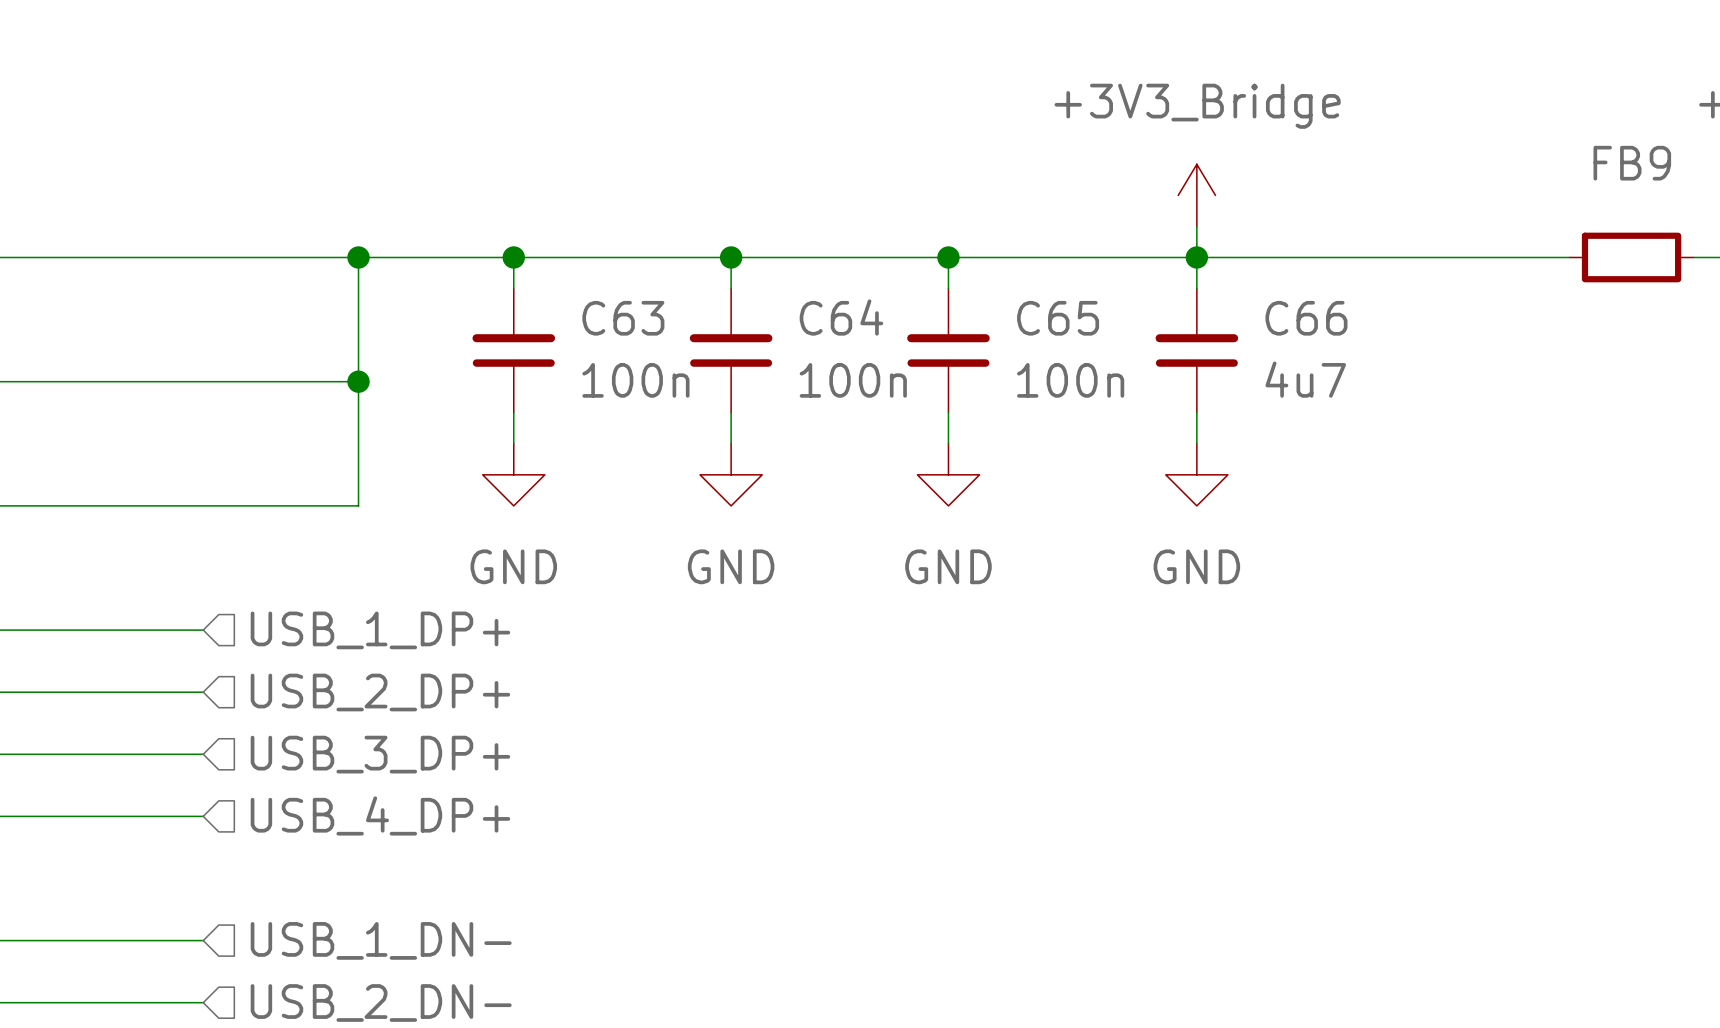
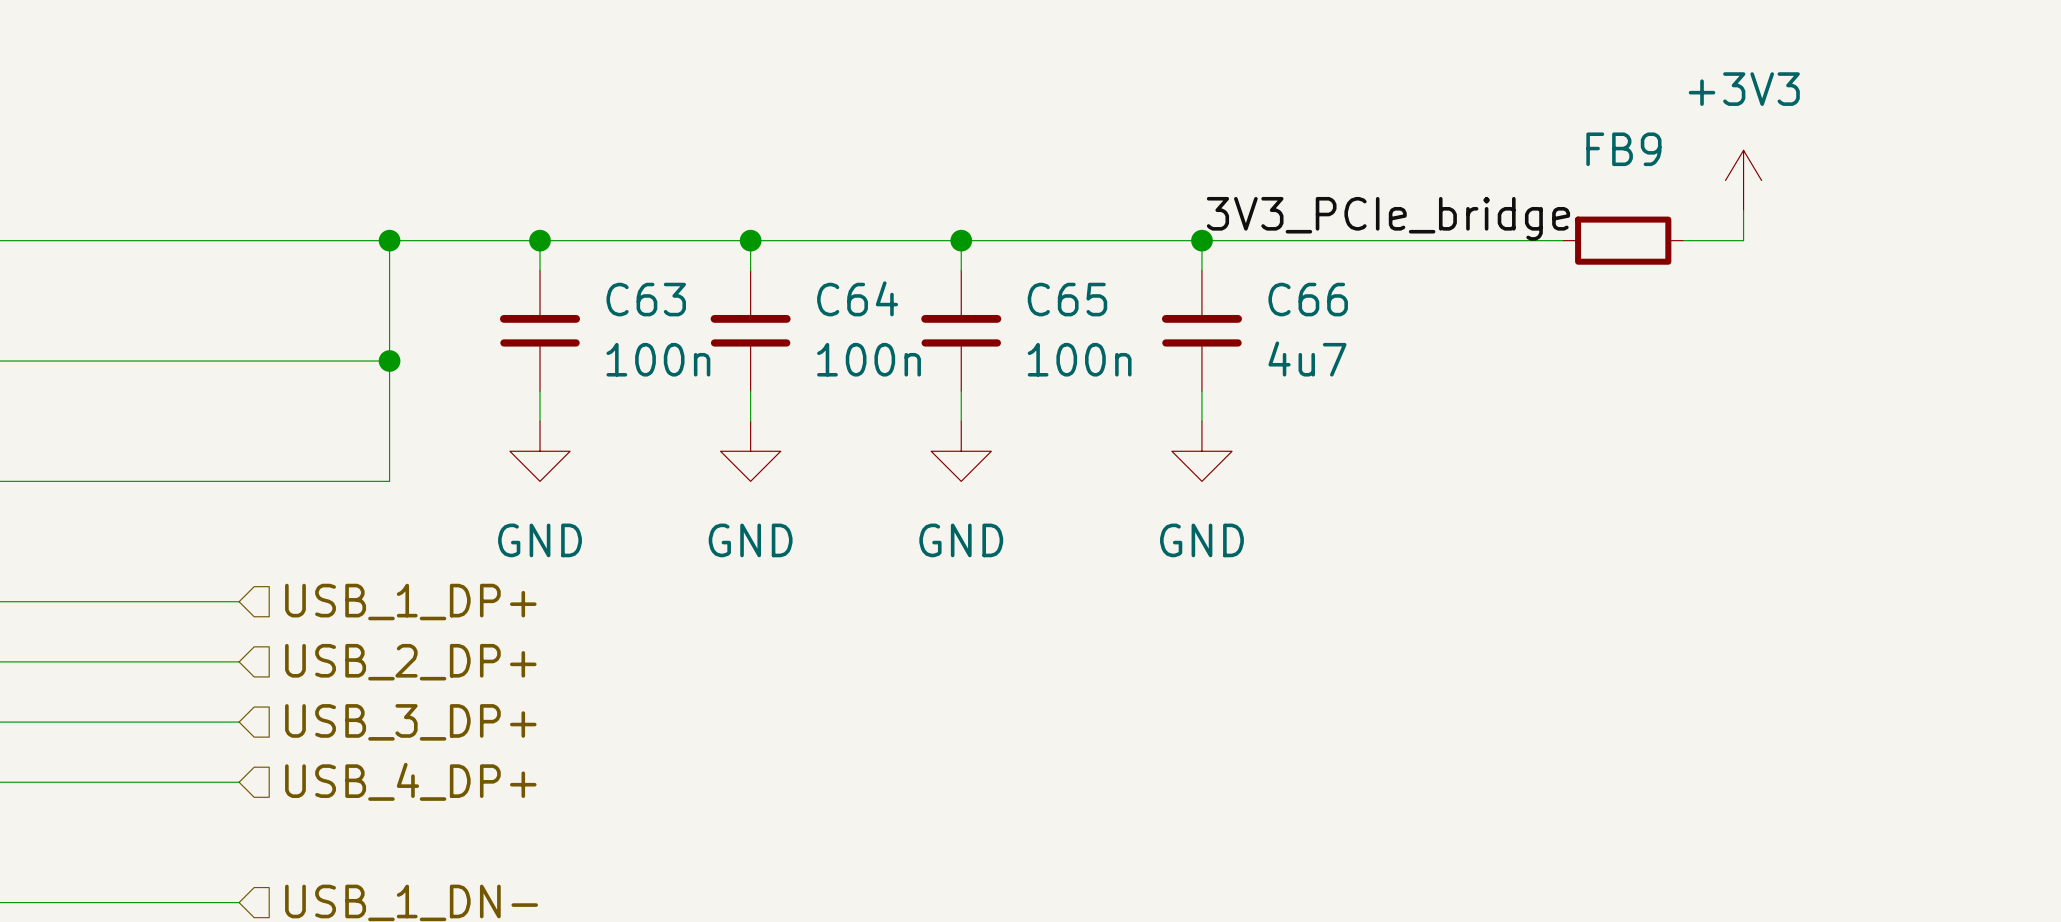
power symbol: +3V3_Bridge (1196, 195) -> none
wire: (1196, 226) (1196, 257) -> none
label: none -> 3V3_PCIe_bridge (1388, 218)

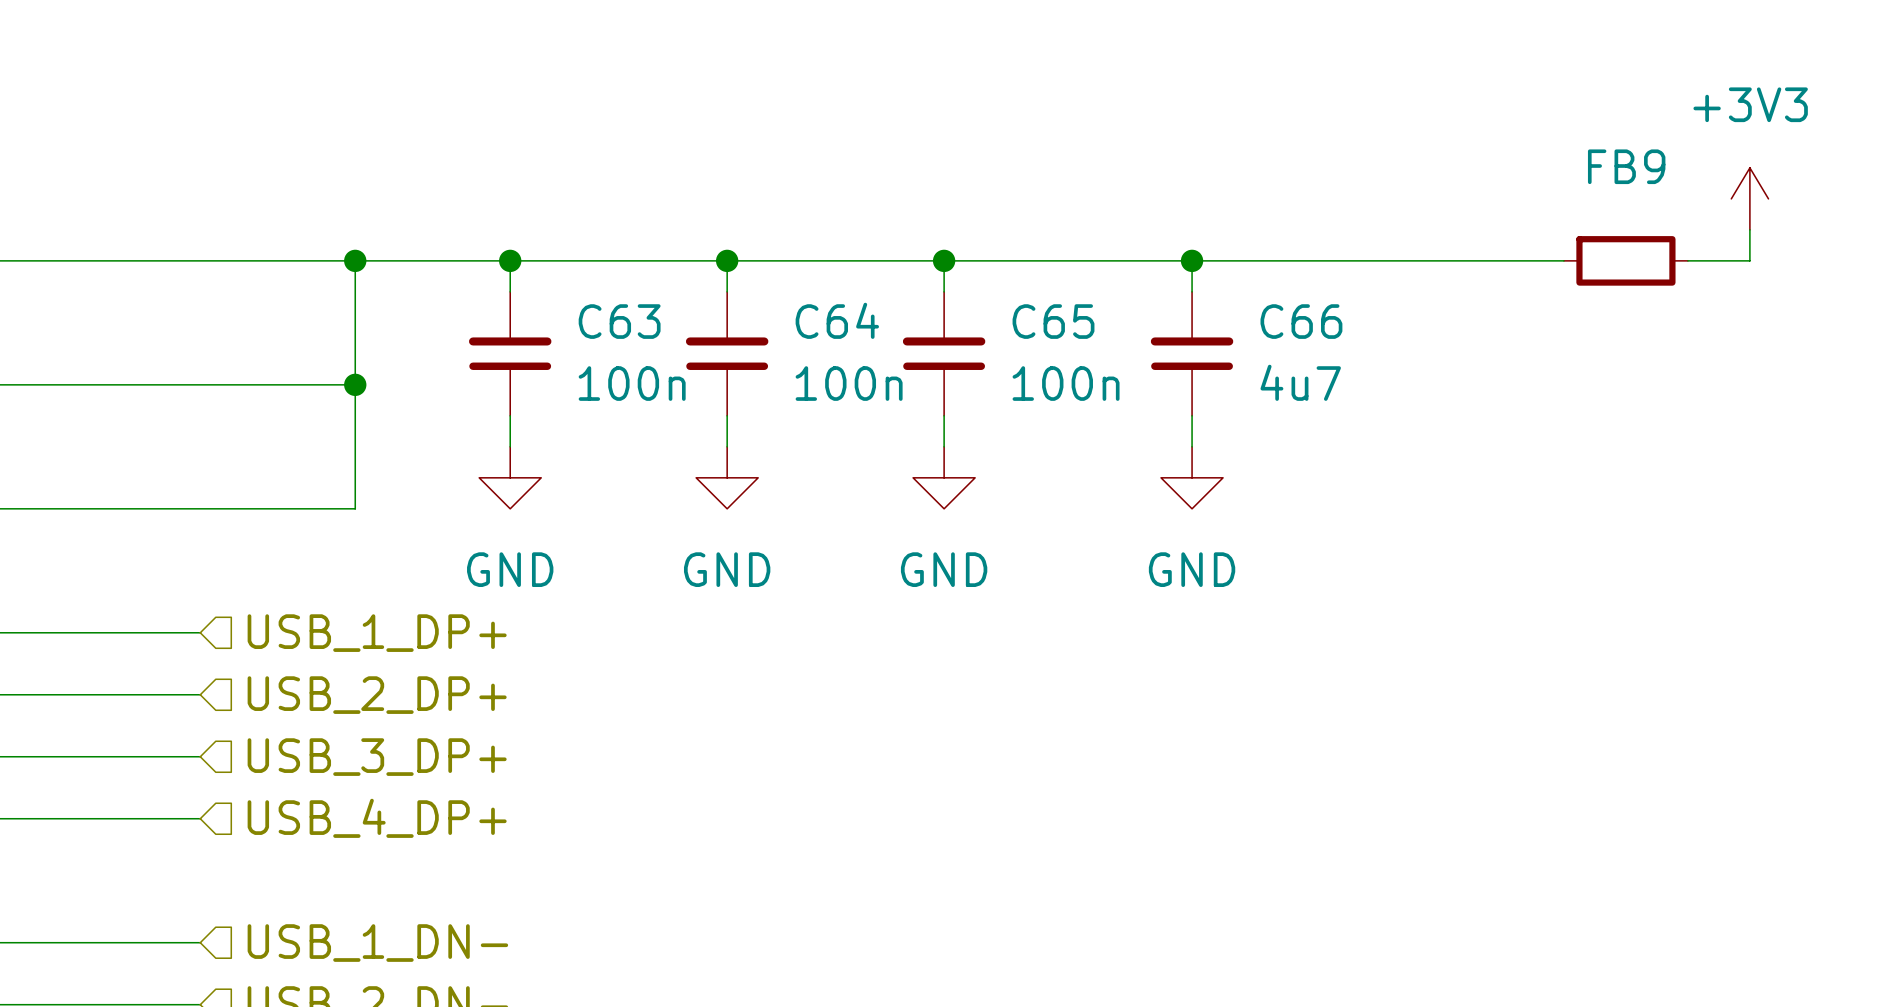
label: 3V3_PCIe_bridge (1388, 218) -> none

